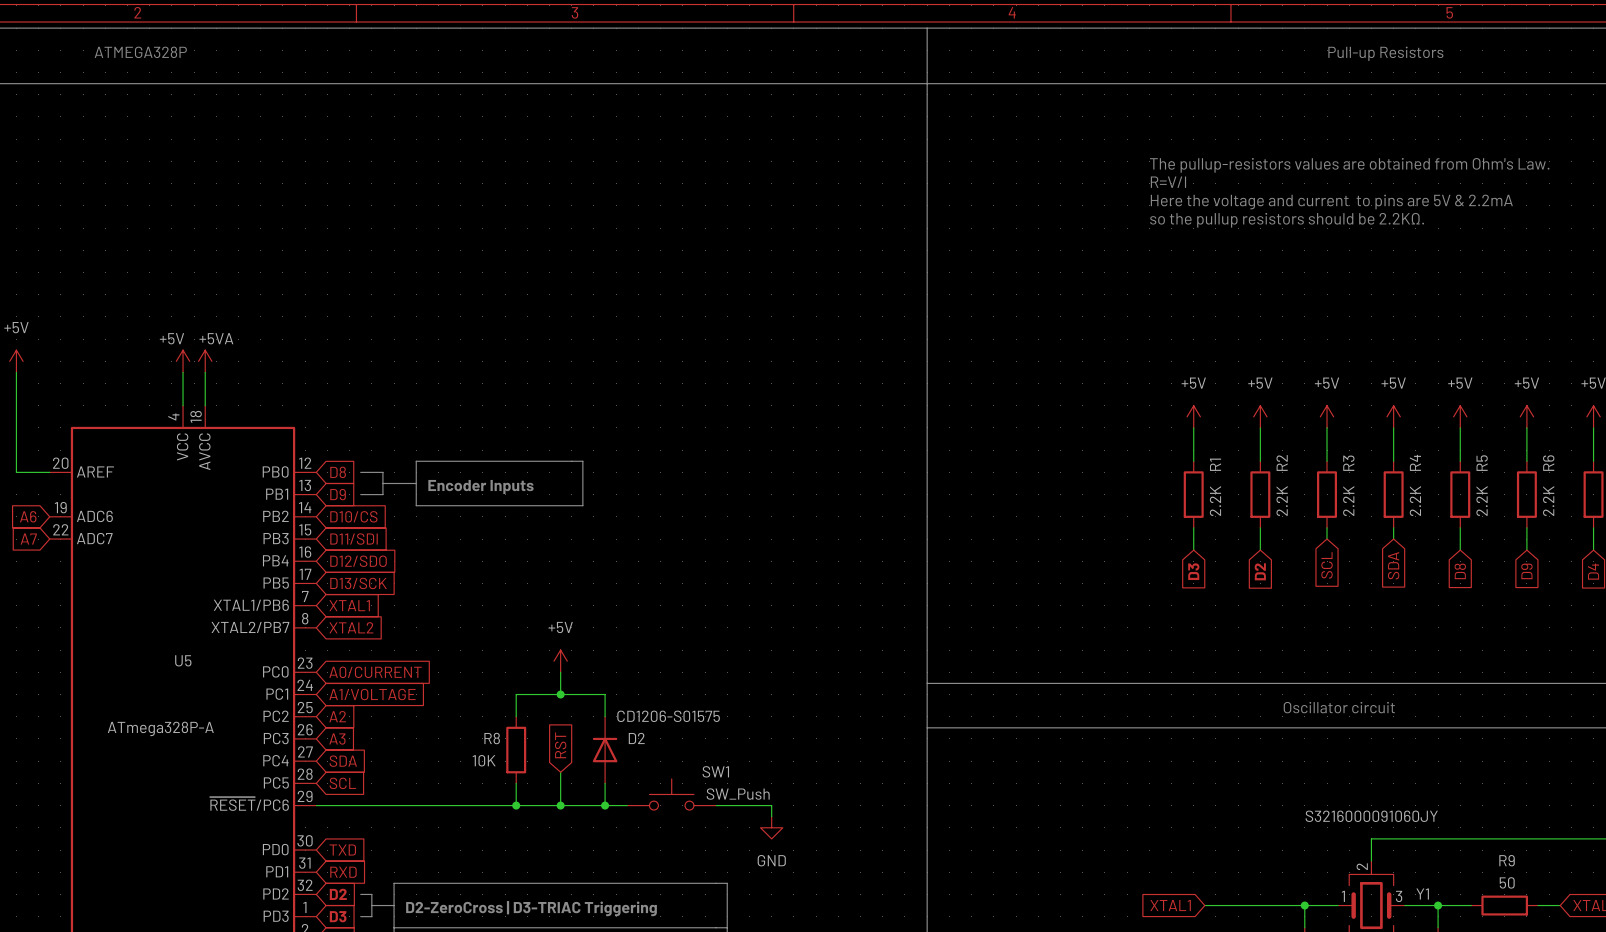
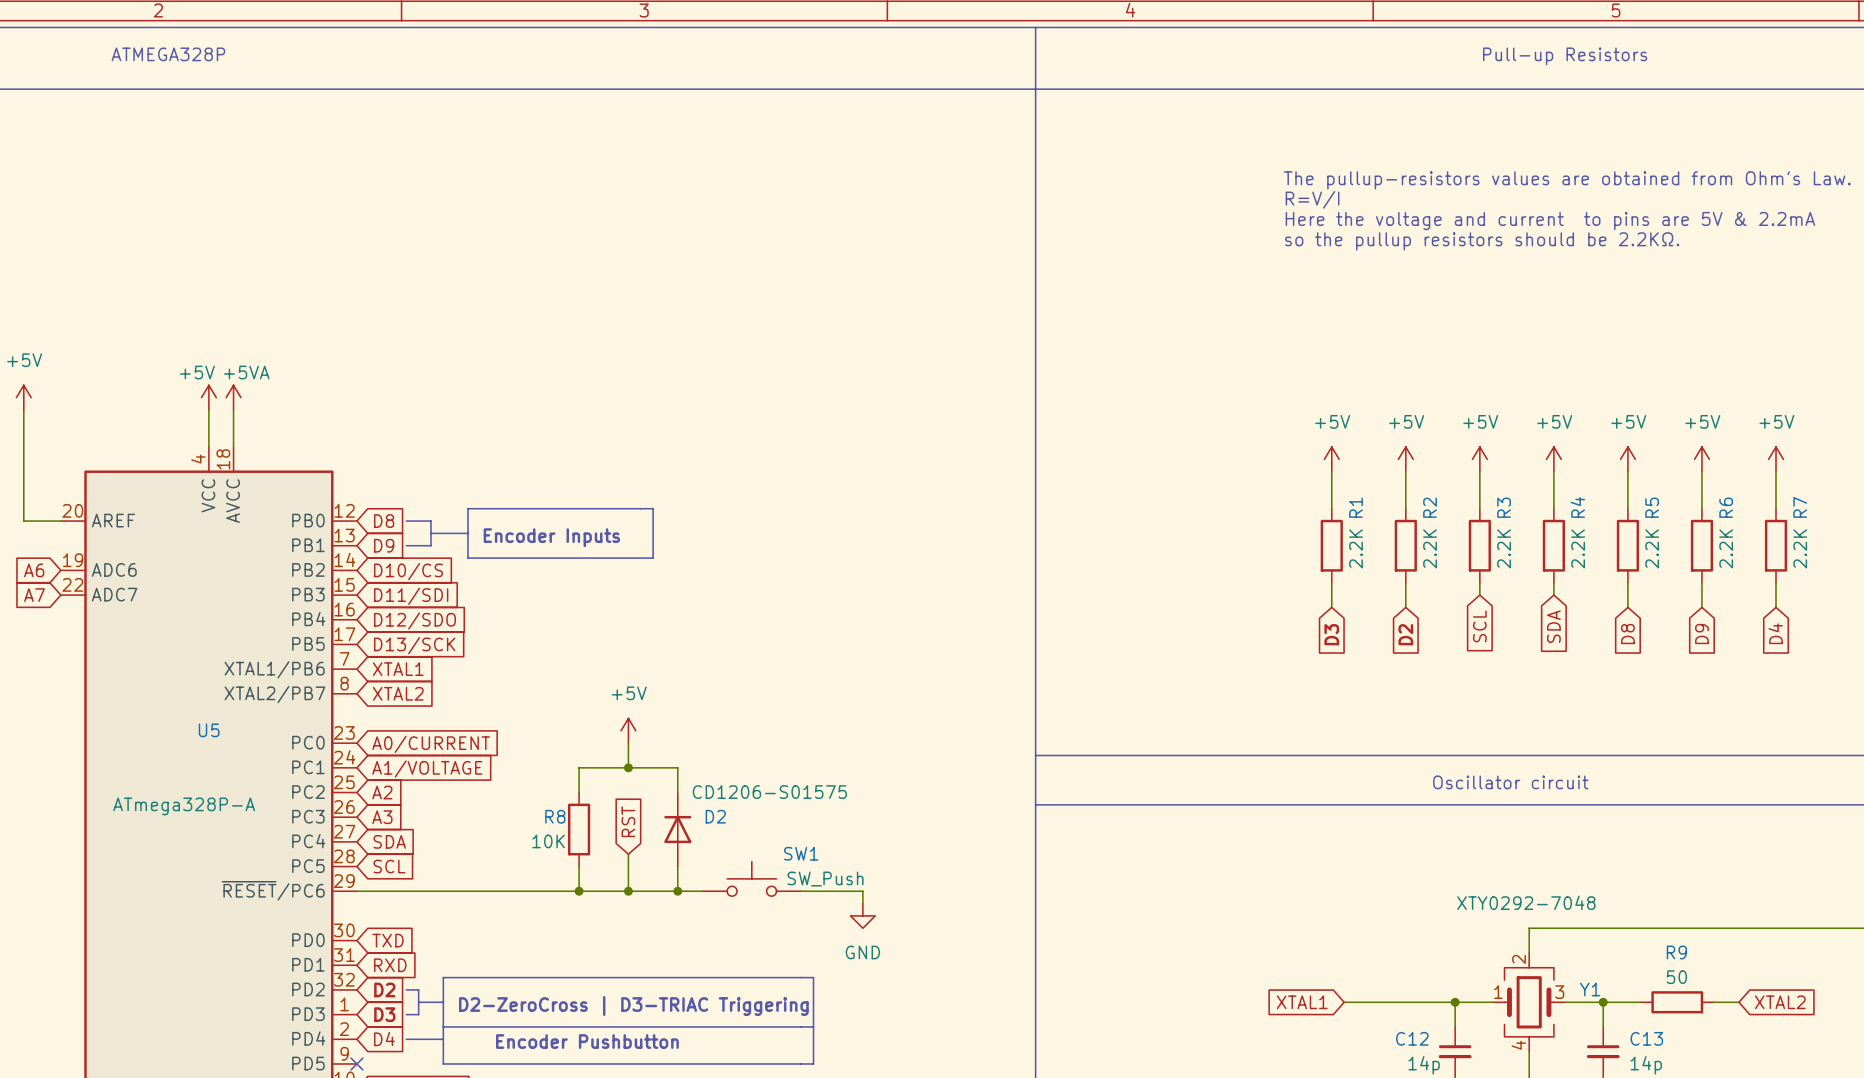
Y1 value: S3216000091060JY (1371, 816) -> XTY0292-7048 (1526, 902)

